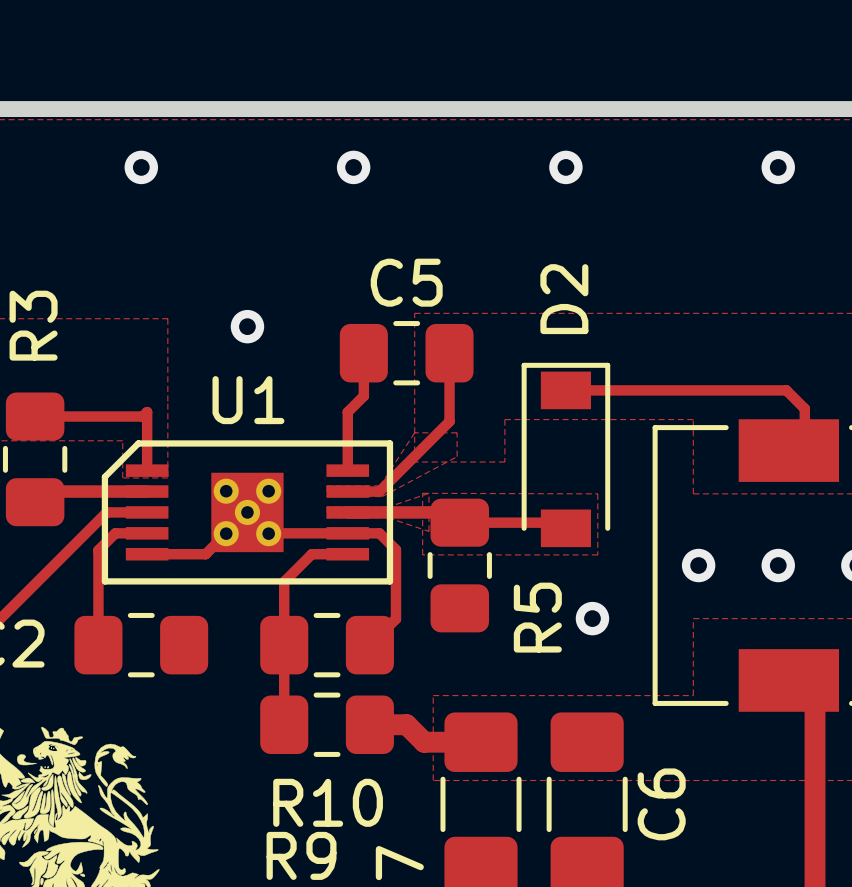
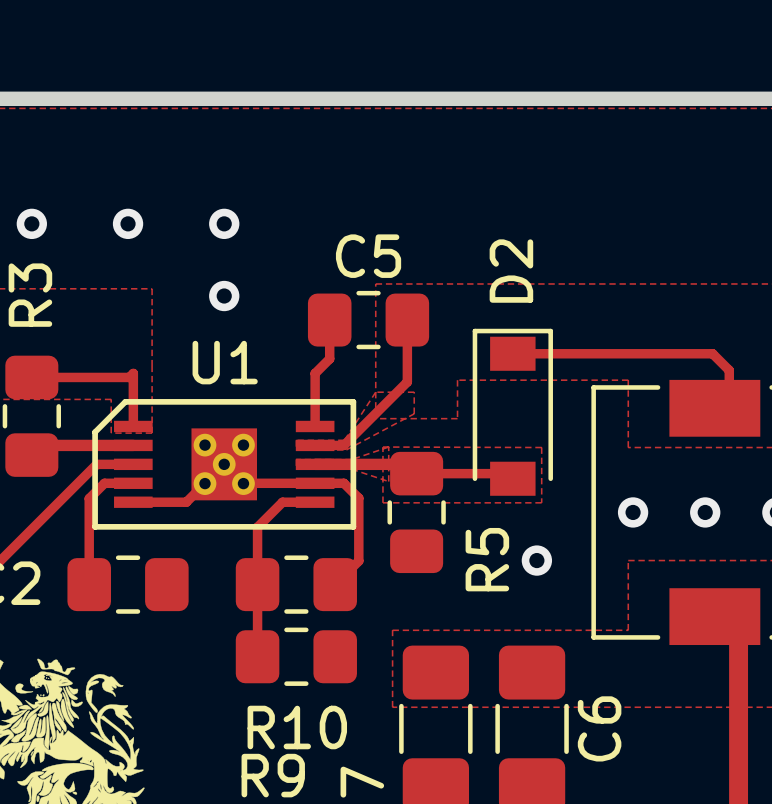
via: (141, 167) -> none
via: (353, 167) -> none
via: (565, 167) -> none
via: (778, 167) -> none
via: none -> (31, 223)
via: none -> (128, 223)
via: none -> (224, 223)
track: (369, 724) (406, 724) (424, 742) (481, 742) -> none

